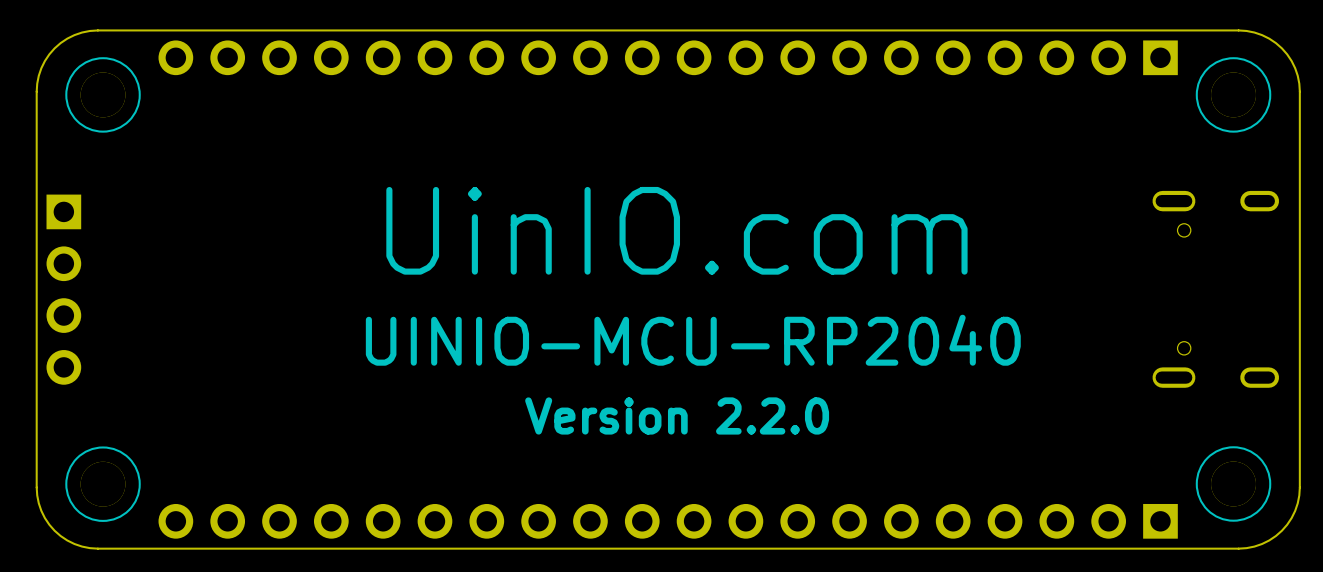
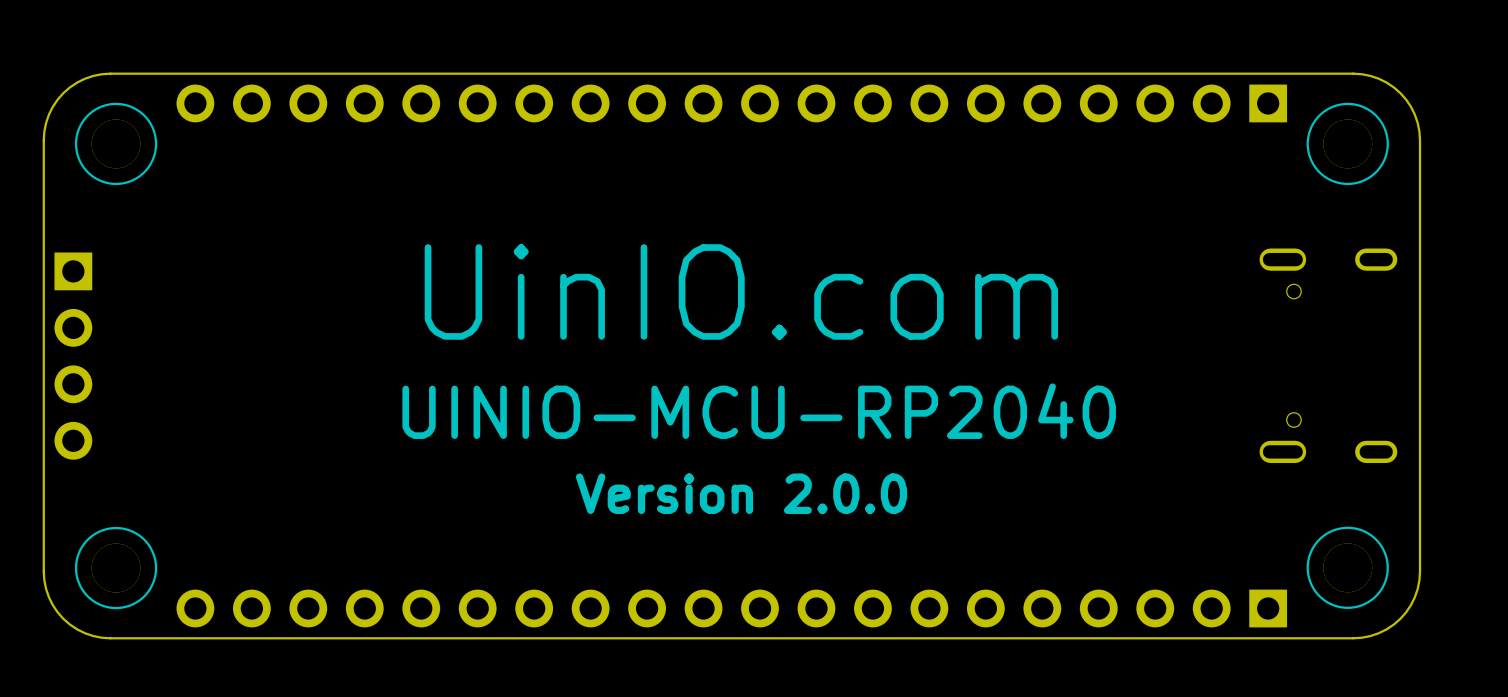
text: Version 2.2.0 (677, 415) -> Version 2.0.0 (741, 493)

